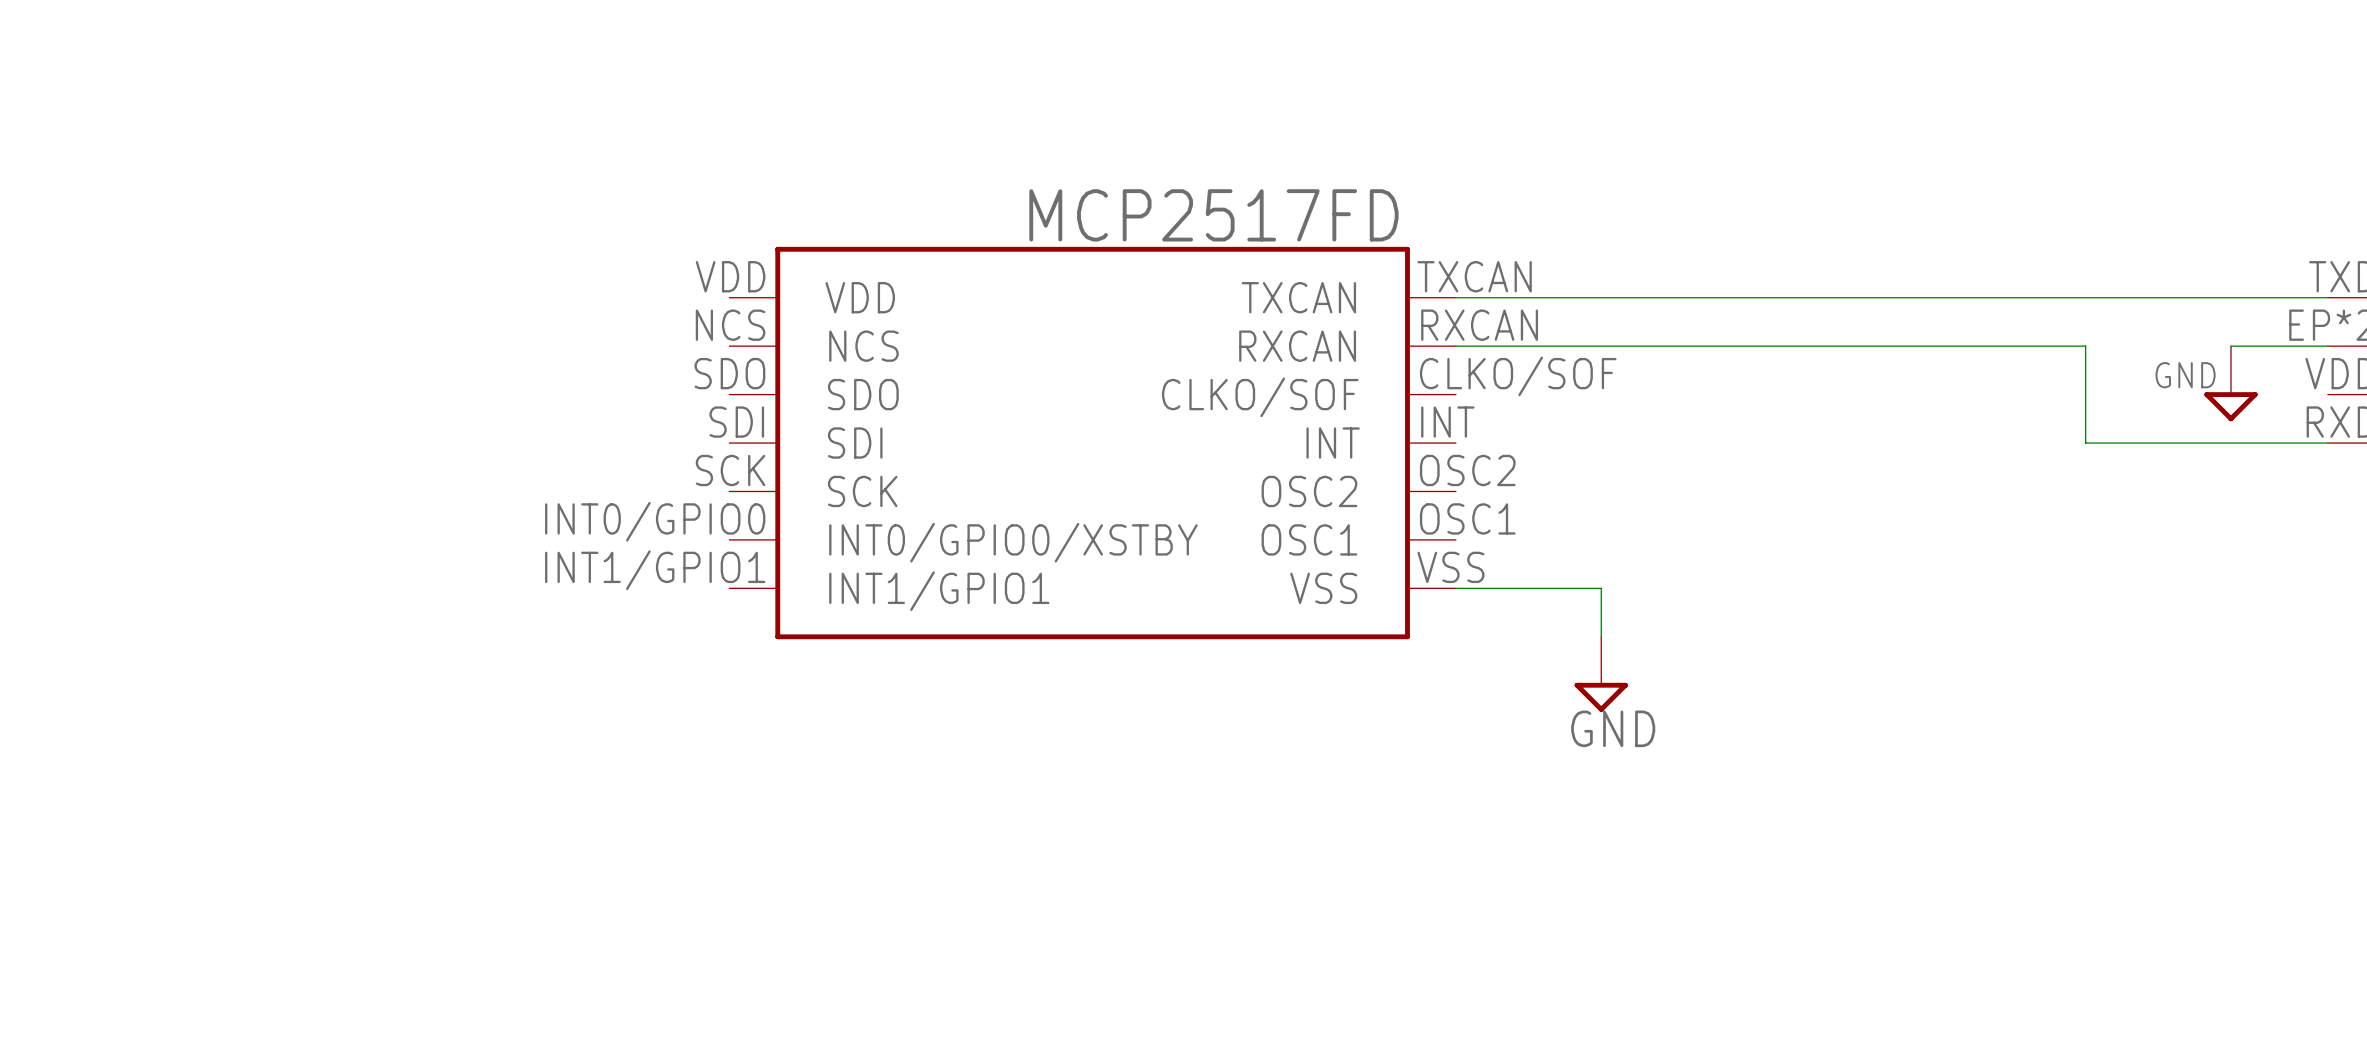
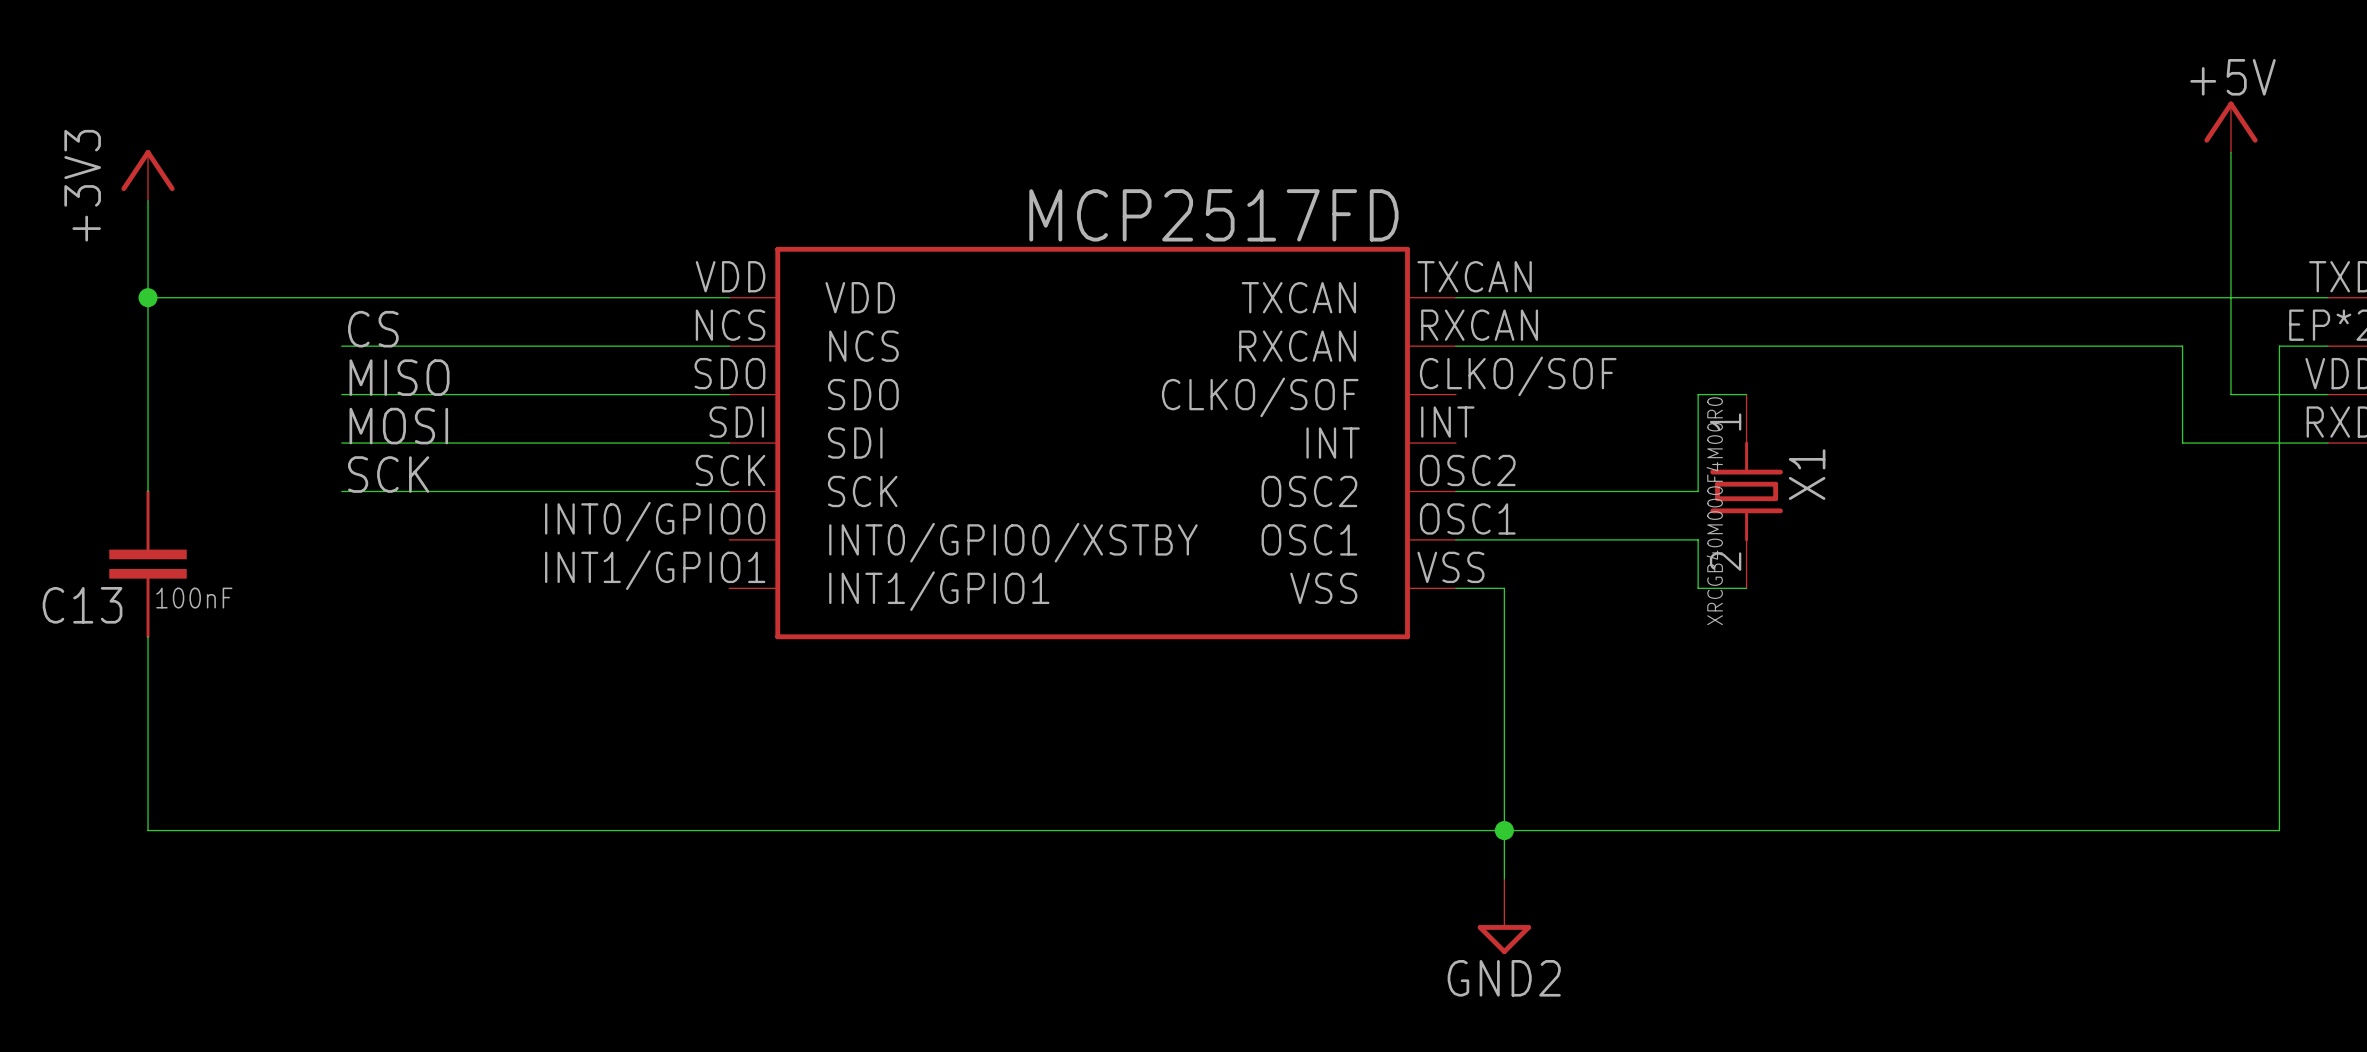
label: none -> +5V (2233, 77)
power symbol: none -> (2230, 126)
wire: none -> (2230, 152) (2230, 394) (2327, 394)
power symbol: none -> +3V3 (148, 175)
wire: none -> (148, 200) (148, 491)
wire: none -> (148, 297) (729, 297)
junction: none -> (148, 297)
label: none -> CS (373, 329)
wire: none -> (341, 346) (729, 346)
wire: (2085, 346) (2085, 443) (2182, 443) -> (2085, 346) (2182, 346) (2182, 443)
wire: (2230, 346) (2279, 346) -> (148, 636) (148, 830) (2279, 830) (2279, 346)
label: none -> MISO (399, 377)
power symbol: GND (2230, 383) -> none
wire: none -> (341, 394) (729, 394)
wire: none -> (1746, 394) (1698, 394) (1698, 491) (1455, 491)
label: none -> MOSI (398, 426)
wire: none -> (341, 443) (729, 443)
label: none -> SCK (388, 474)
wire: none -> (341, 491) (729, 491)
X1: none -> XRCGB40M000F4M00R0 (1746, 491)
wire: none -> (1455, 539) (1698, 539) (1698, 588) (1746, 588)
C13: none -> (148, 564)
wire: (1504, 588) (1601, 588) (1601, 636) -> (1504, 588) (1504, 879)
power symbol: GND (1601, 674) -> none
junction: none -> (1504, 830)
power symbol: none -> (1504, 916)
label: none -> GND2 (1504, 978)

